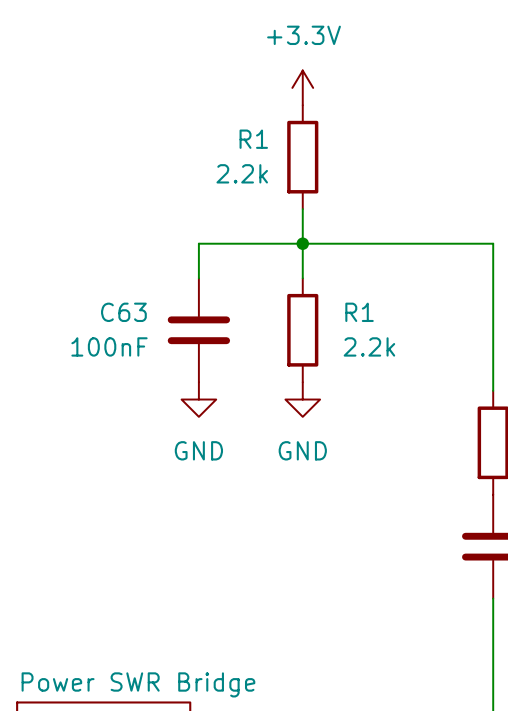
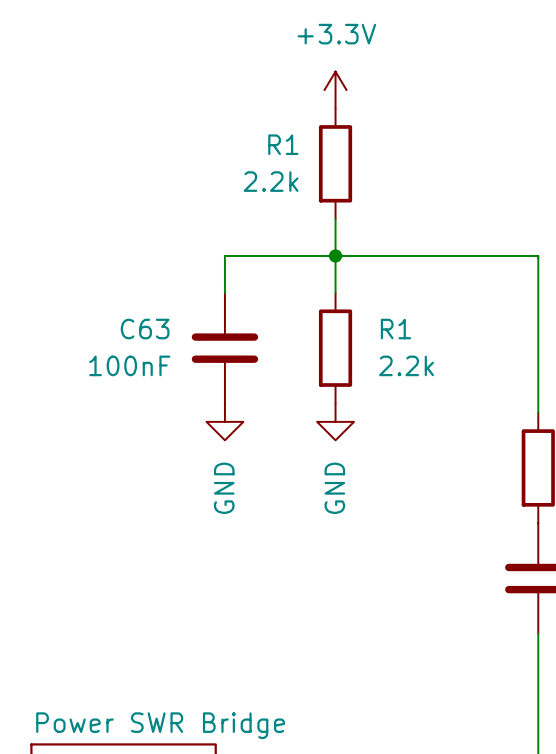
power symbol text rotation: 0° (198, 450) -> 90° counterclockwise (224, 488)
power symbol text rotation: 0° (302, 450) -> 90° counterclockwise (334, 488)

